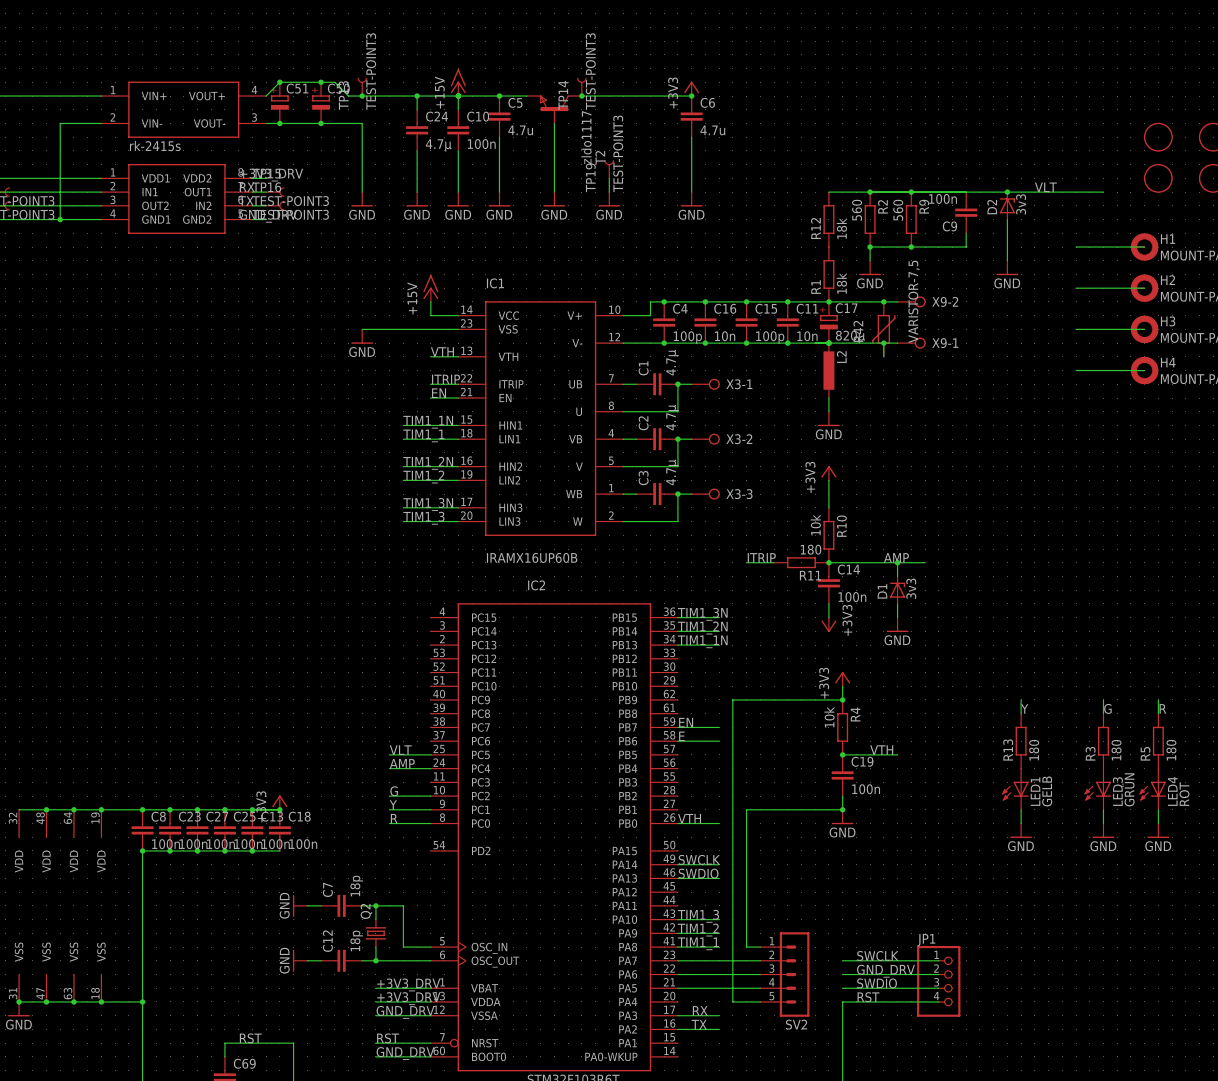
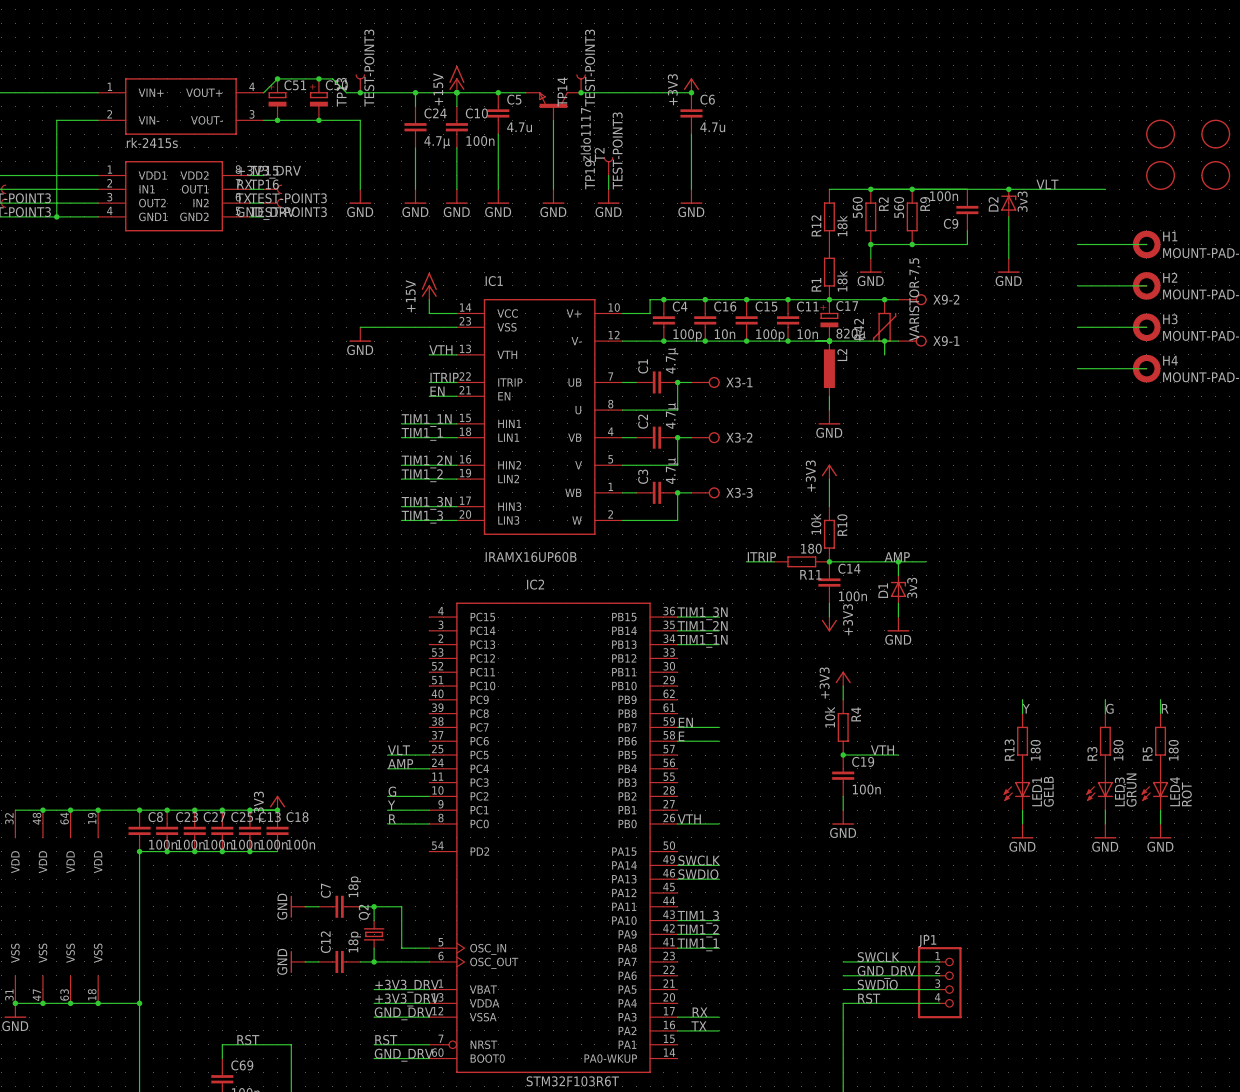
wire: (842, 699) (732, 699) (732, 1001) (760, 1001) -> none
junction: (842, 699) -> none
wire: (842, 809) (746, 809) (746, 947) (760, 947) -> none
junction: (842, 809) -> none
wire: (677, 960) (760, 960) -> none
wire: (677, 974) (760, 974) -> none
SV2: (784, 974) -> none
wire: (677, 988) (760, 988) -> none

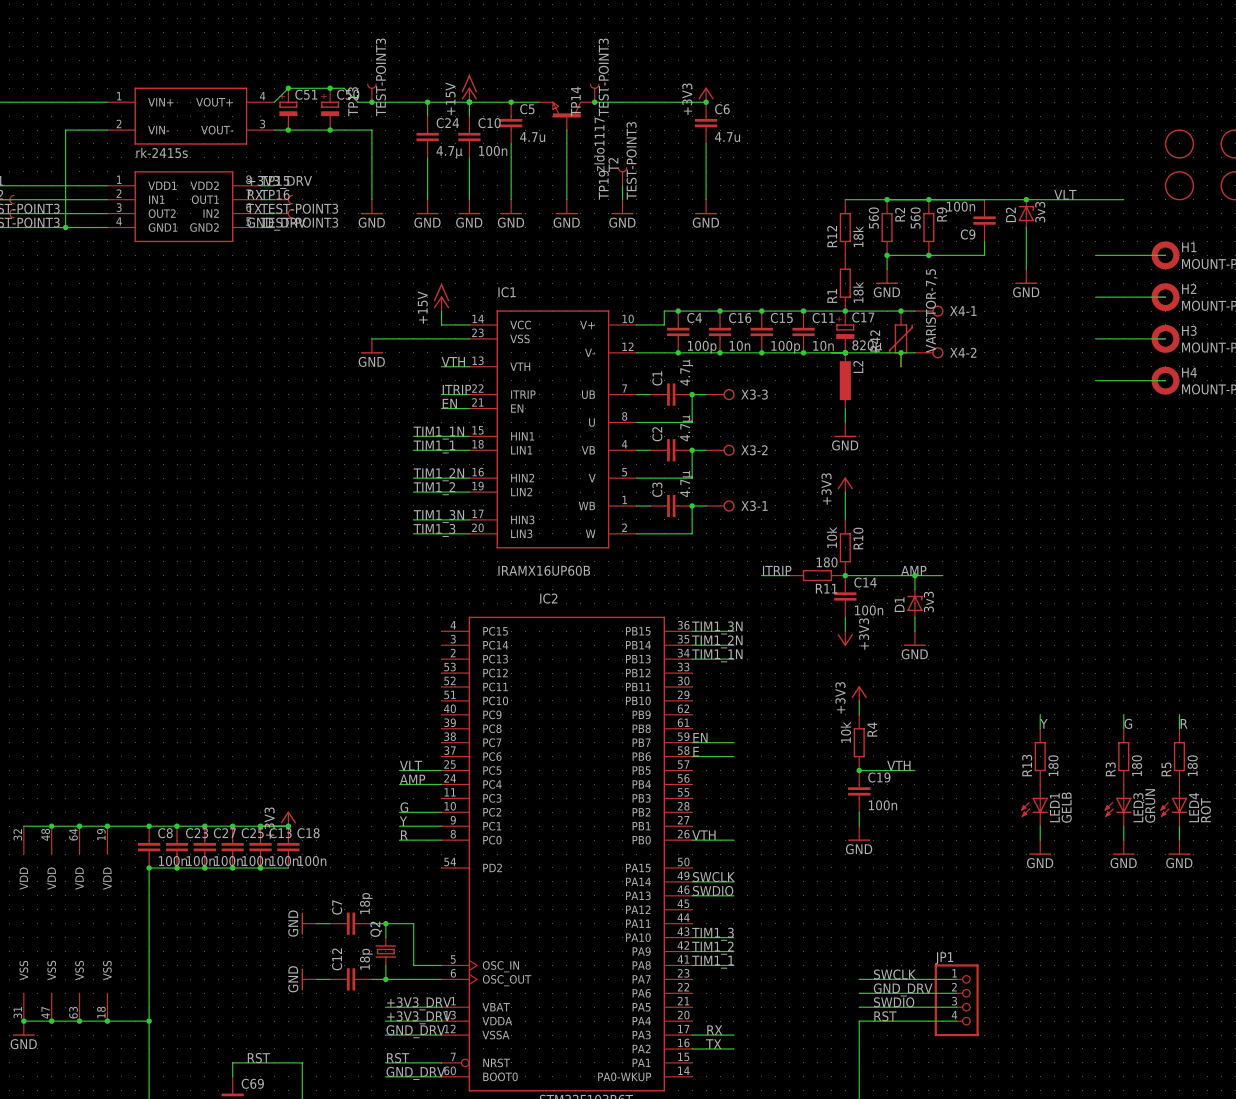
X9-2 name: X9-2 (946, 299) -> X4-1 (963, 311)
X9-1 name: X9-1 (946, 341) -> X4-2 (963, 352)
X3-1 name: X3-1 (739, 382) -> X3-3 (754, 394)
X3-3 name: X3-3 (739, 492) -> X3-1 (754, 506)

